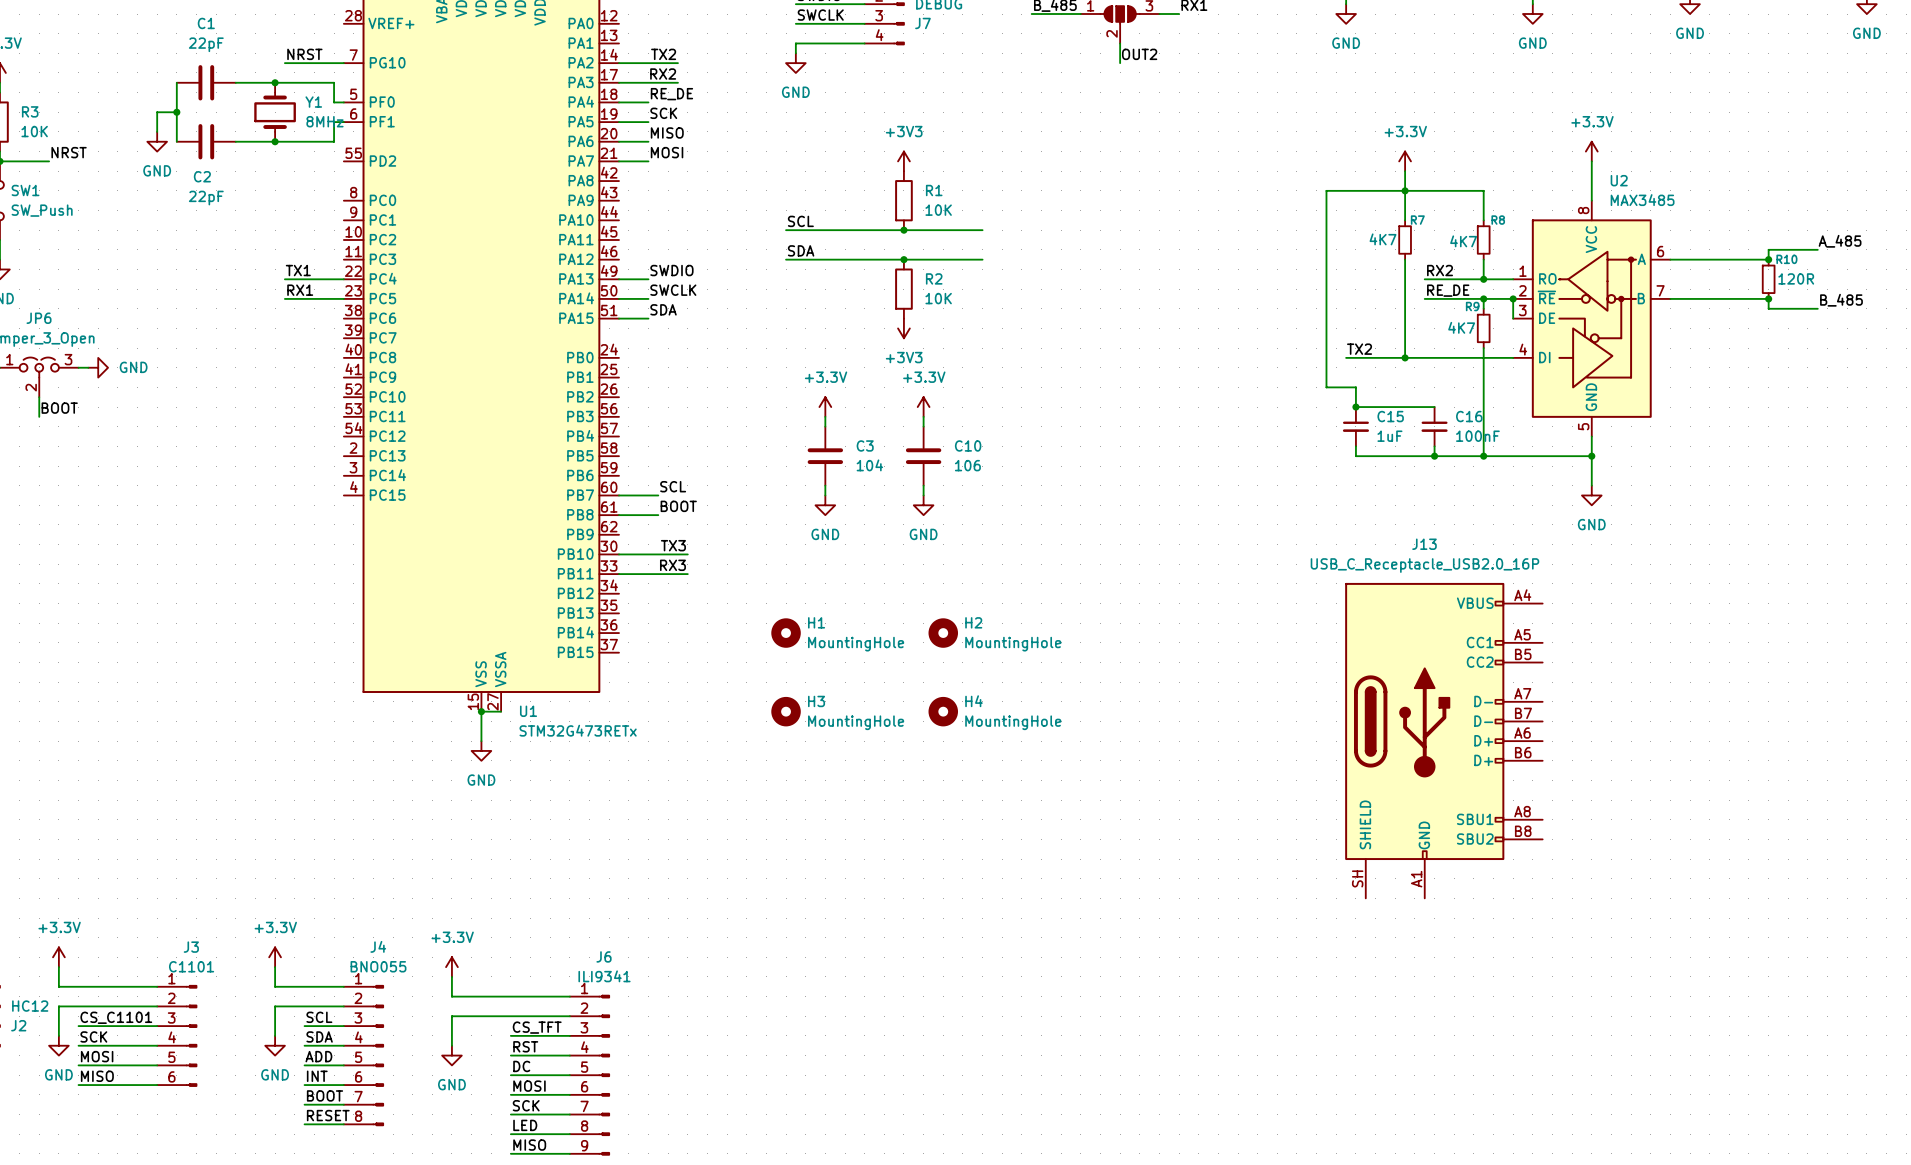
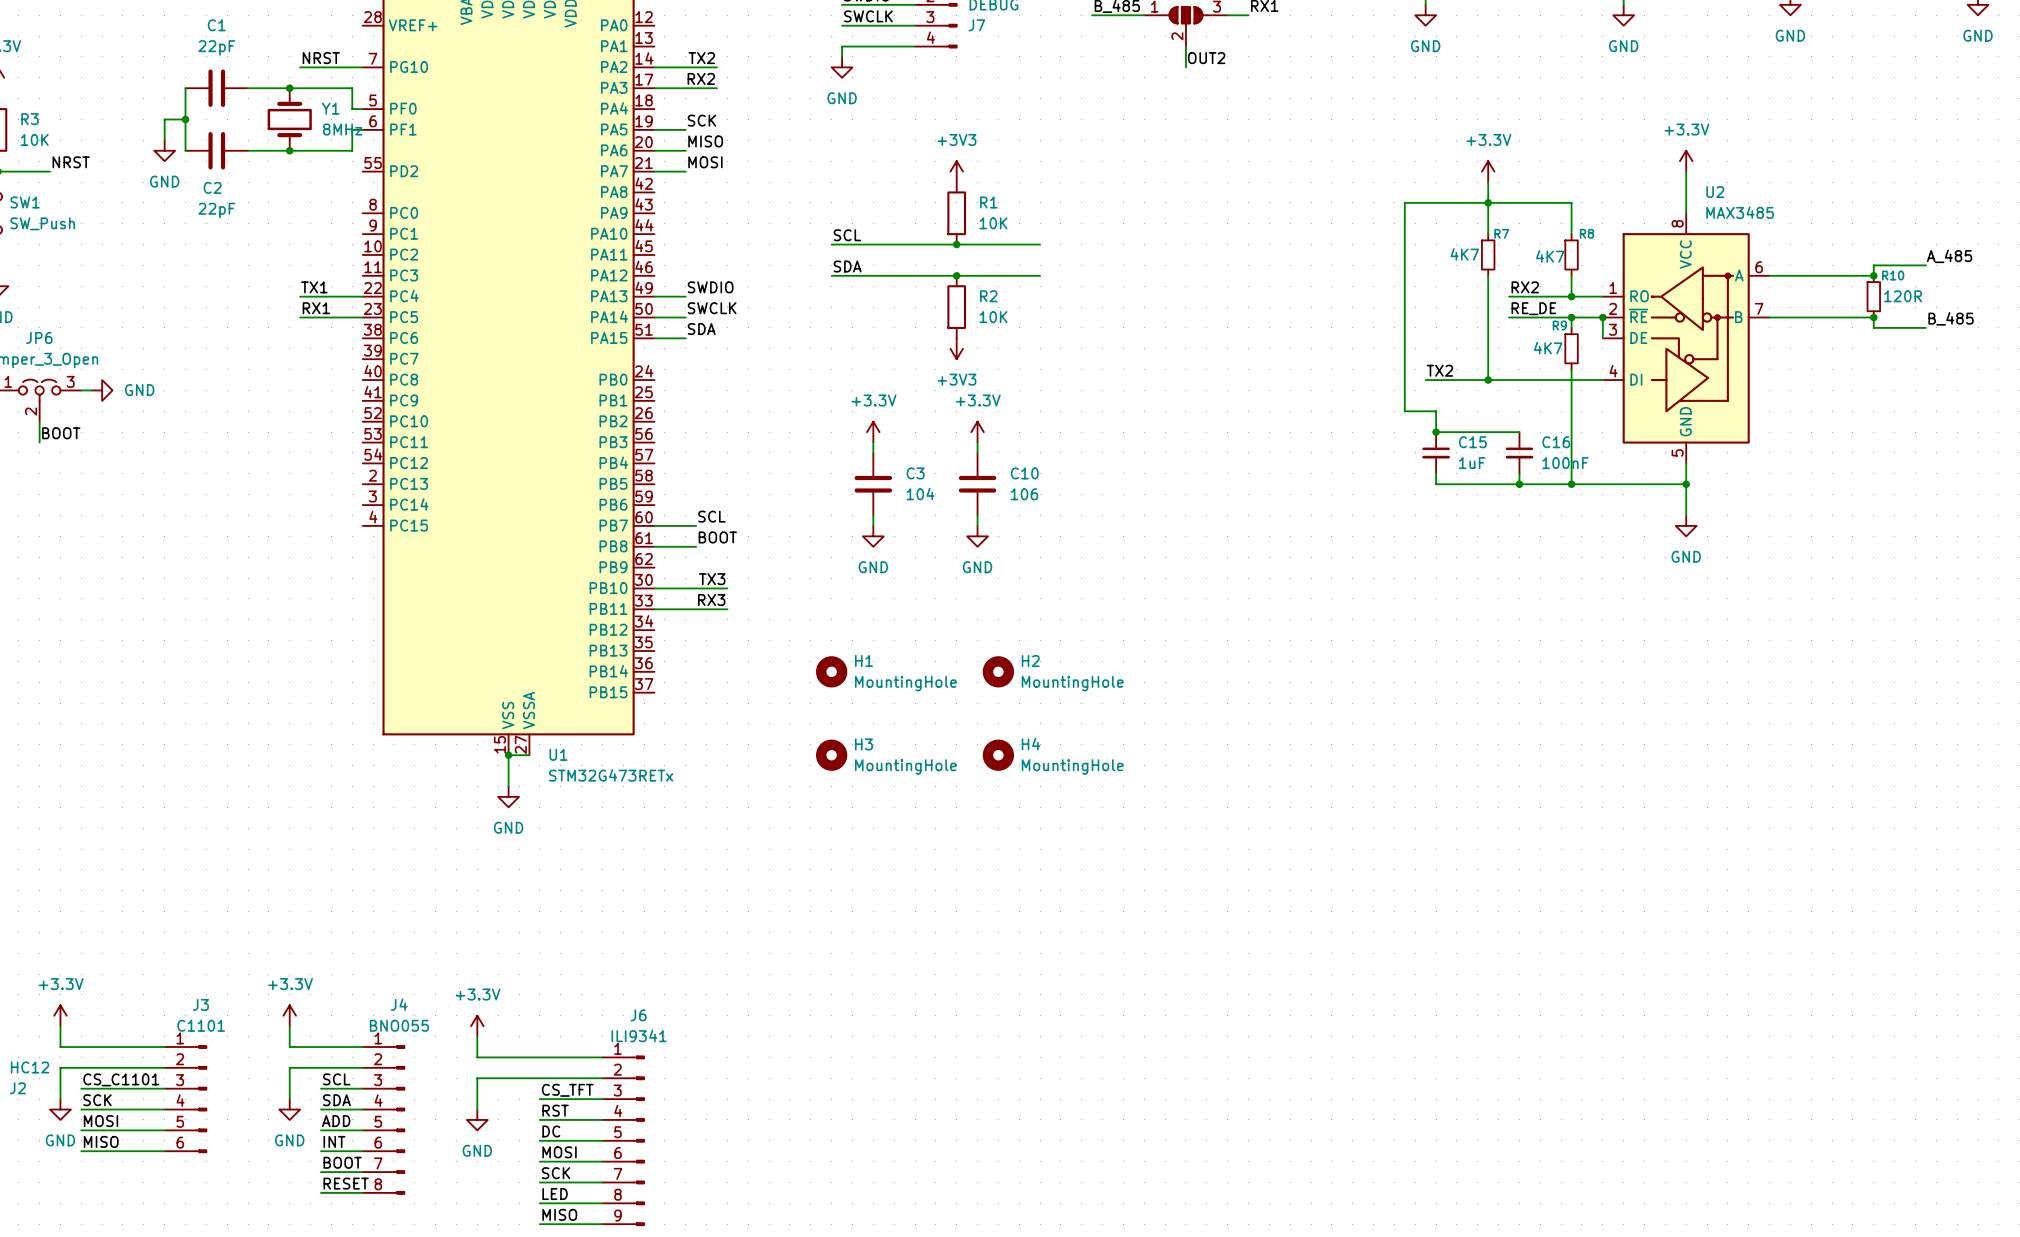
label: RE_DE (671, 94) -> none
wire: (619, 102) (648, 102) -> none
J13: USB_C_Receptacle_USB2.0_16P (1443, 740) -> none

